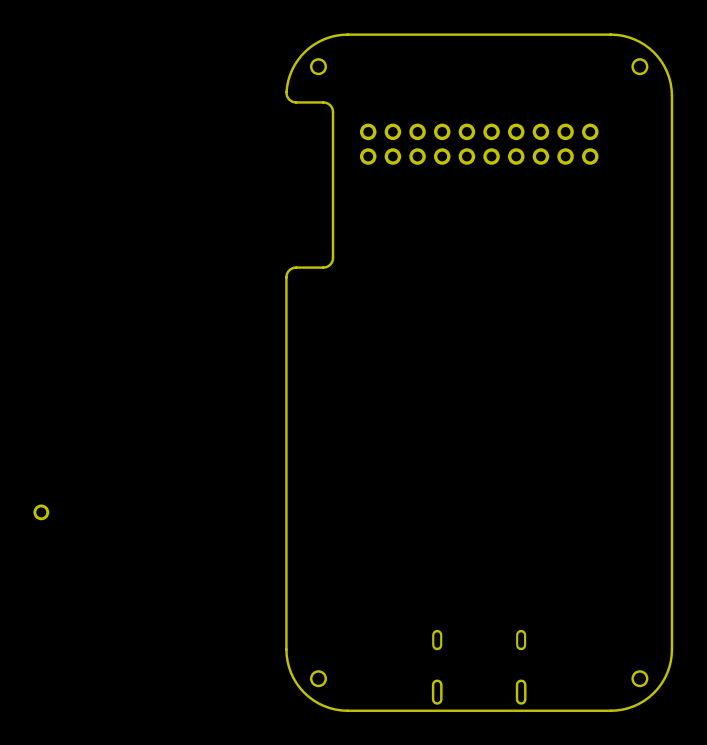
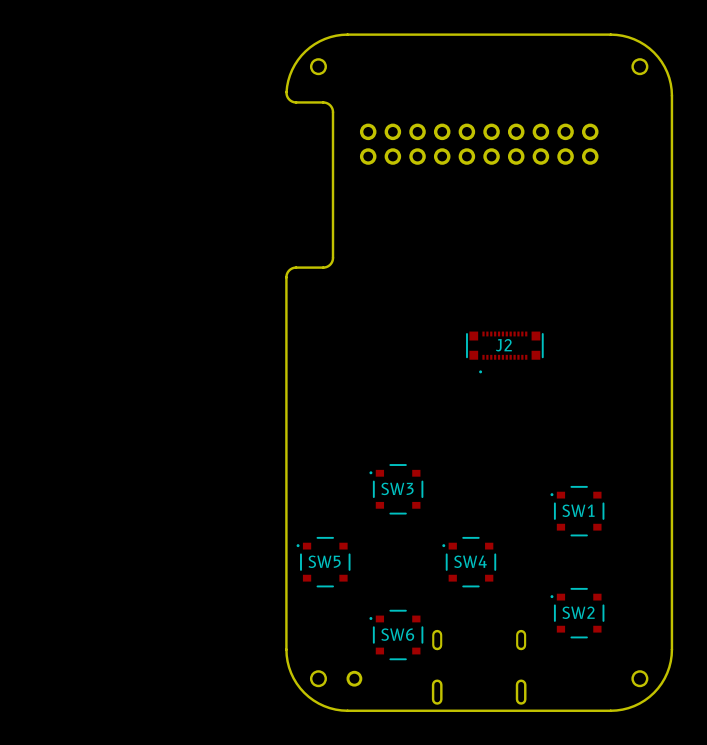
J2: none -> (504, 352)
SW3: none -> (396, 489)
SW1: none -> (577, 511)
part: (41, 512) -> none
SW5: none -> (323, 562)
SW4: none -> (469, 562)
SW2: none -> (577, 613)
SW6: none -> (396, 635)
part: none -> (354, 678)

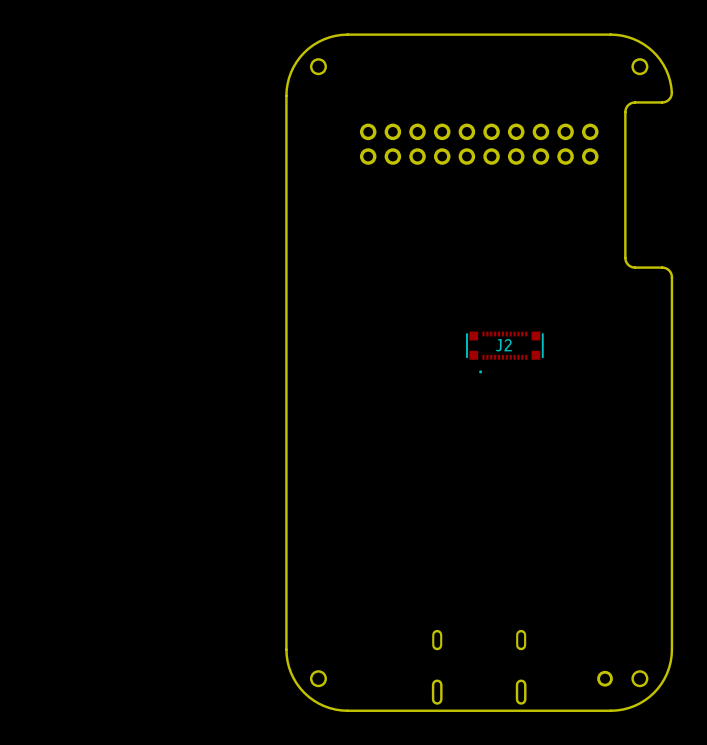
board edge: (347, 34) (330, 37) (310, 47) (294, 64) (288, 80) (286, 94) (290, 100) (325, 102) (332, 110) (333, 257) (330, 263) (325, 267) (291, 268) (287, 272) (286, 277) -> (347, 34) (324, 39) (308, 48) (296, 61) (289, 78) (286, 95) (286, 277)
board edge: (610, 34) (628, 37) (649, 48) (661, 61) (669, 78) (671, 95) (671, 277) -> (610, 34) (627, 37) (648, 47) (663, 64) (670, 80) (671, 94) (667, 100) (632, 102) (625, 109) (625, 257) (627, 263) (632, 267) (666, 268) (670, 272) (671, 277)
SW3: (396, 489) -> none
SW1: (577, 511) -> none
SW5: (323, 562) -> none
SW4: (469, 562) -> none
SW2: (577, 613) -> none
SW6: (396, 635) -> none
part: (354, 678) -> none
part: none -> (605, 678)

